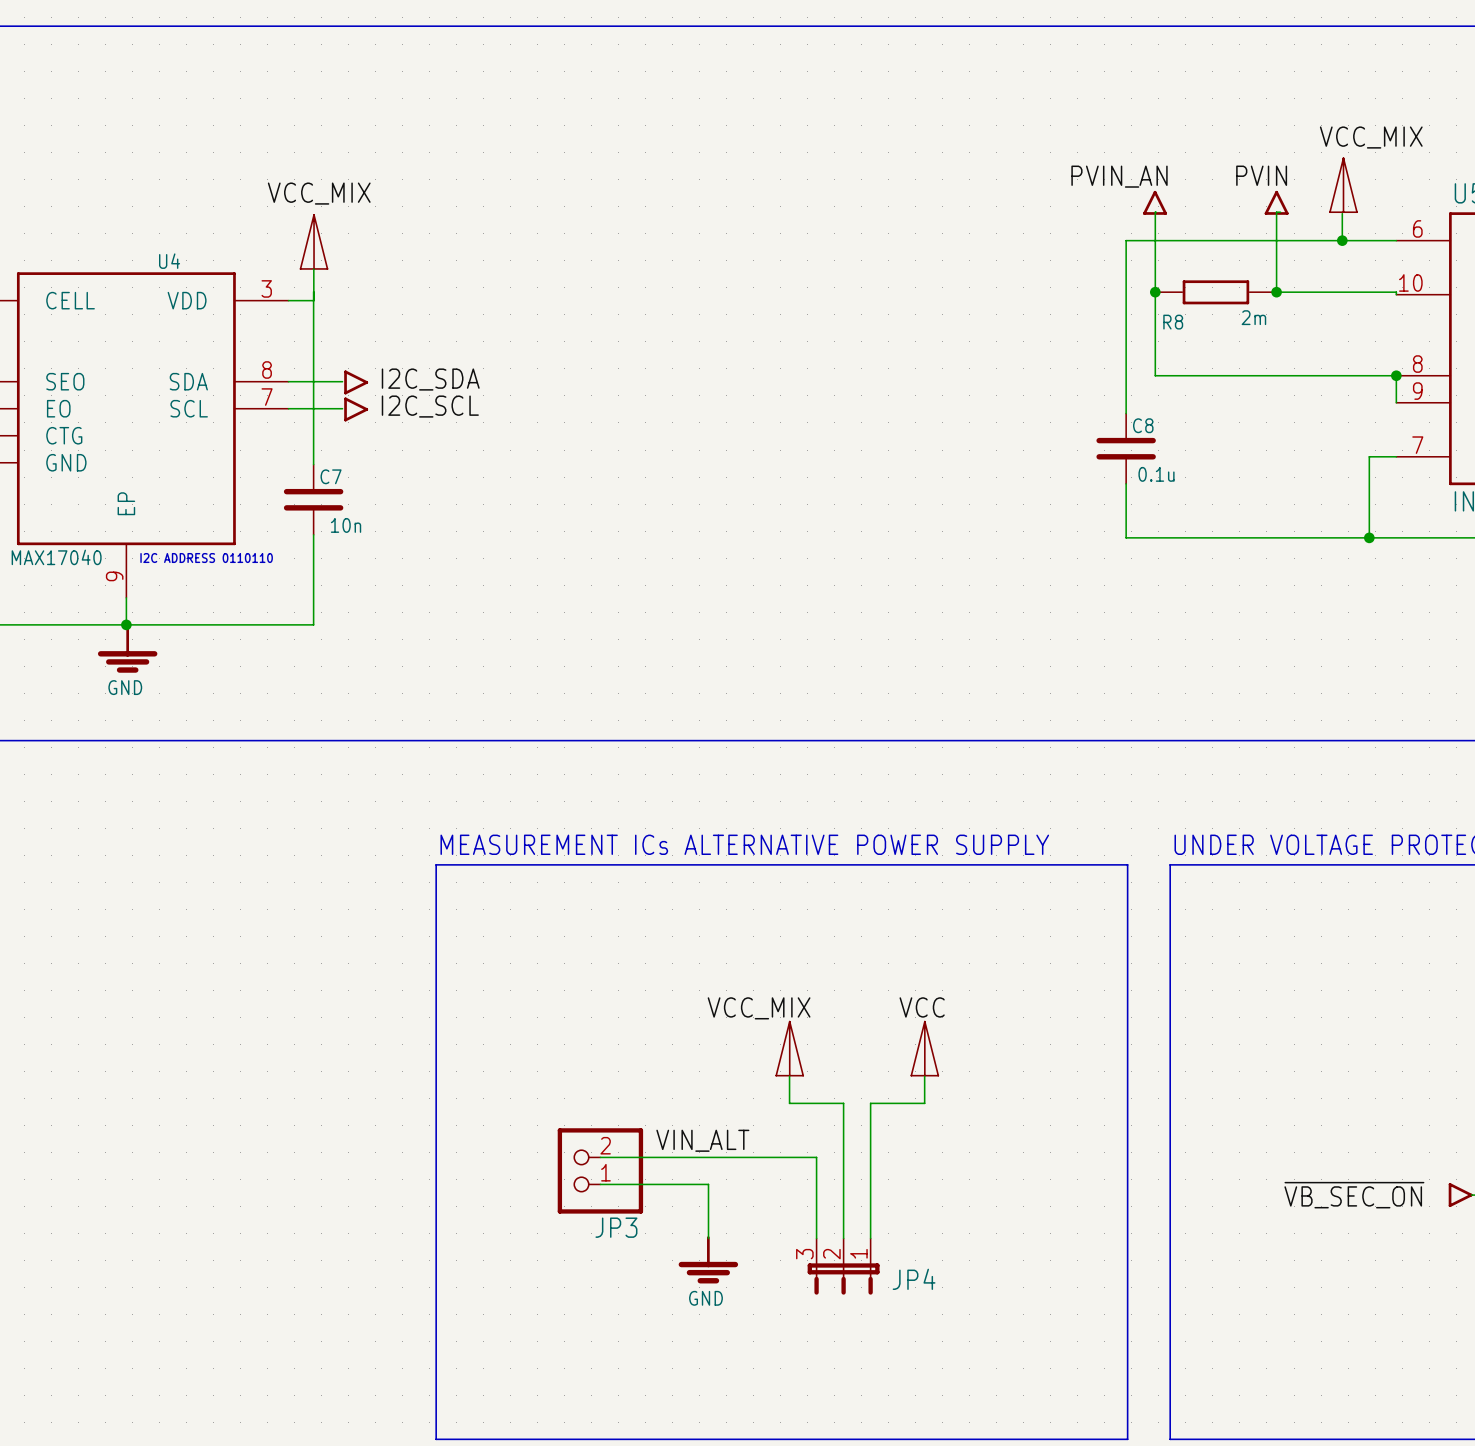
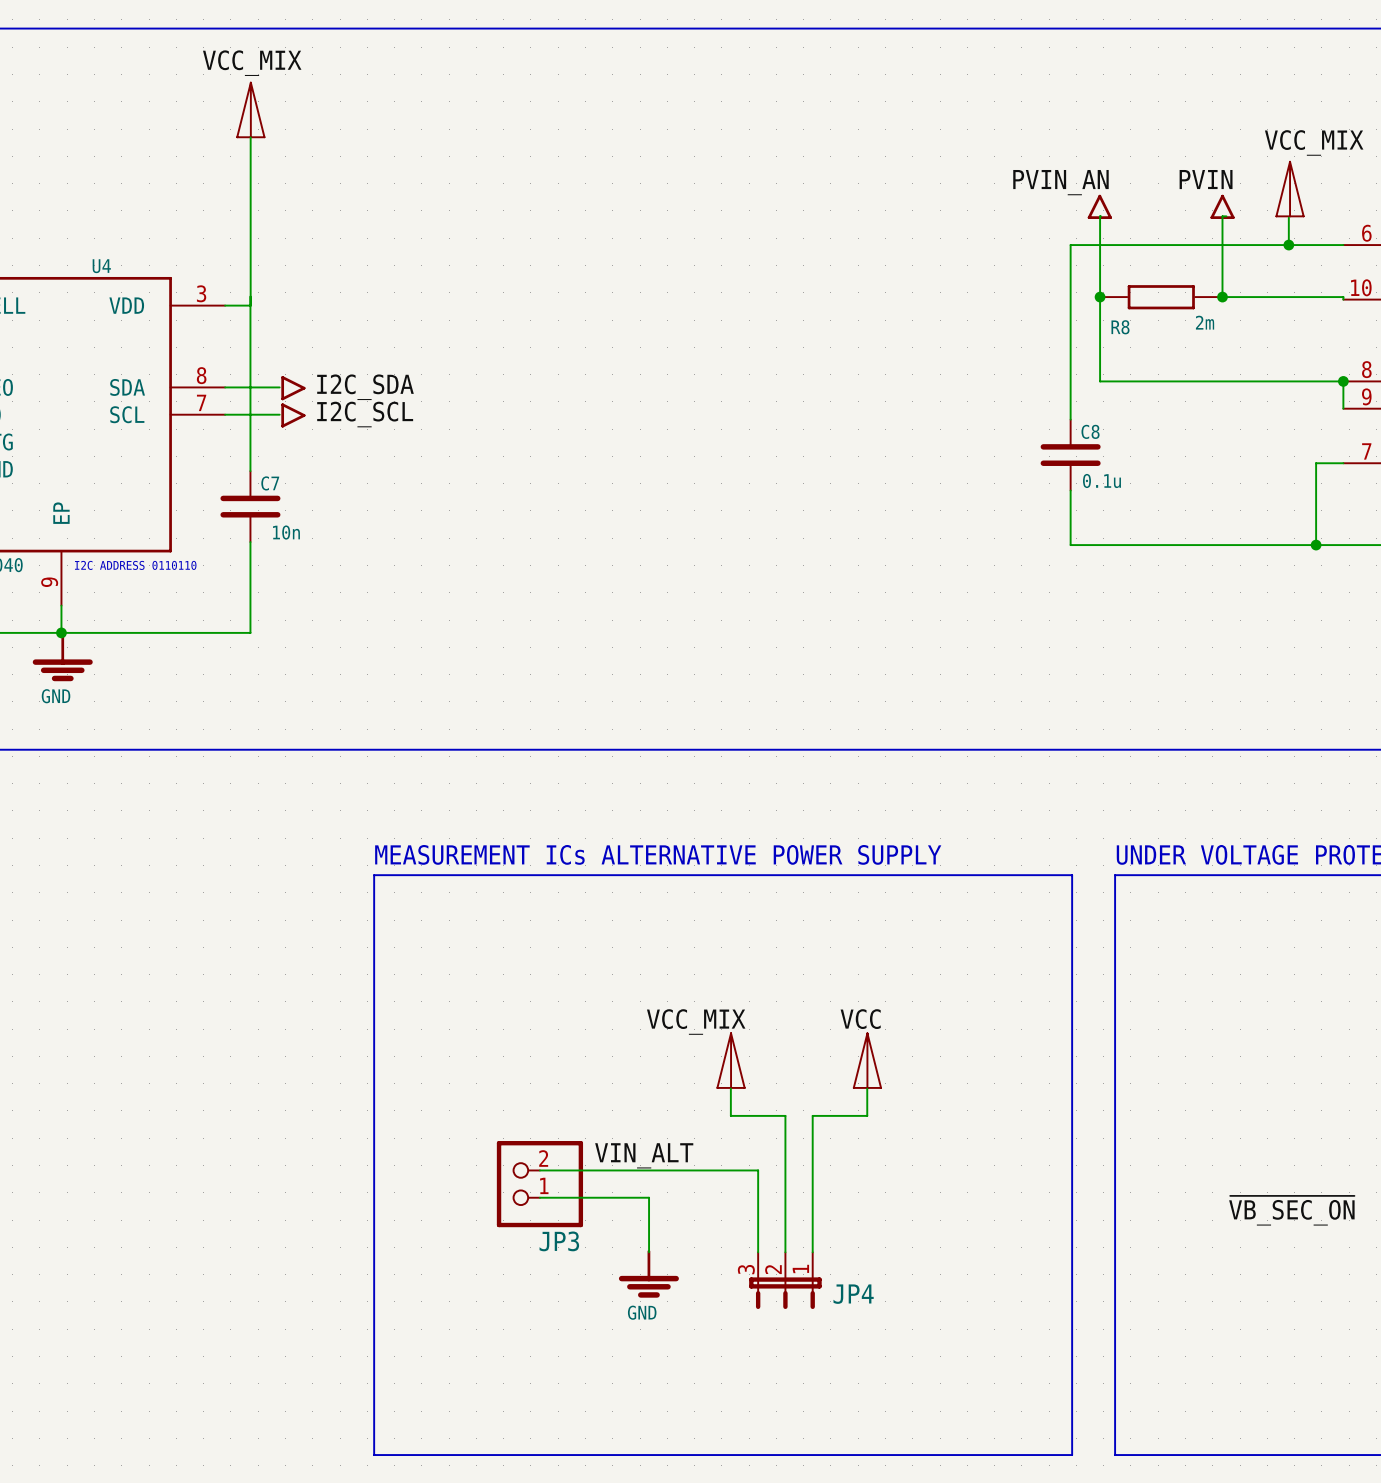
wire: none -> (250, 137) (250, 273)
label position: VCC_MIX (319, 193) -> VCC_MIX (252, 63)
part position: (314, 241) -> (250, 109)

